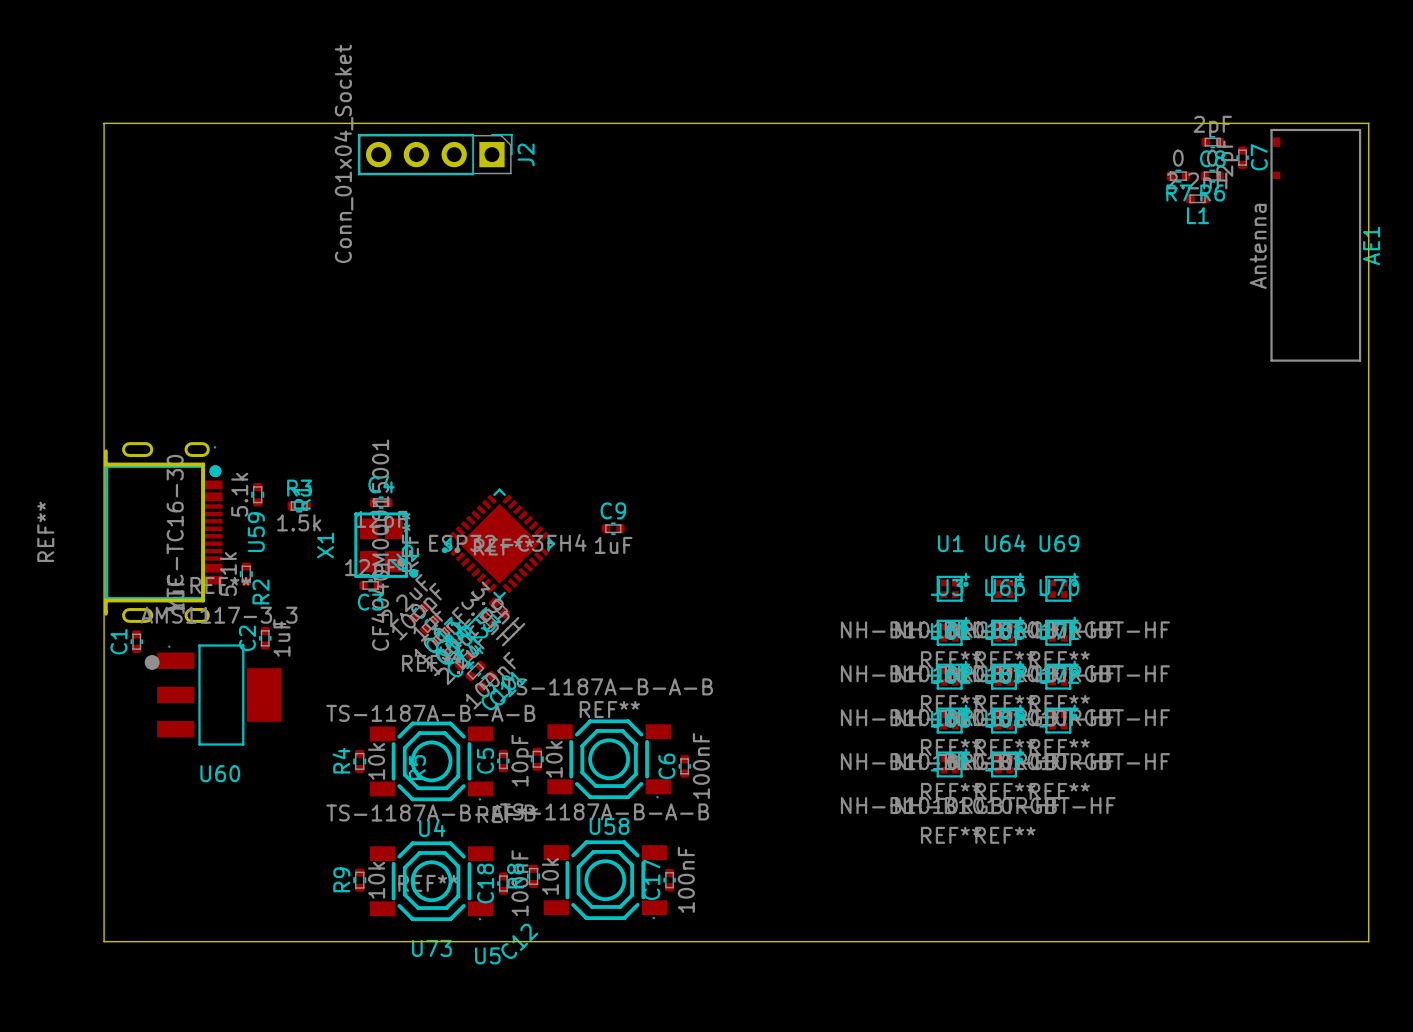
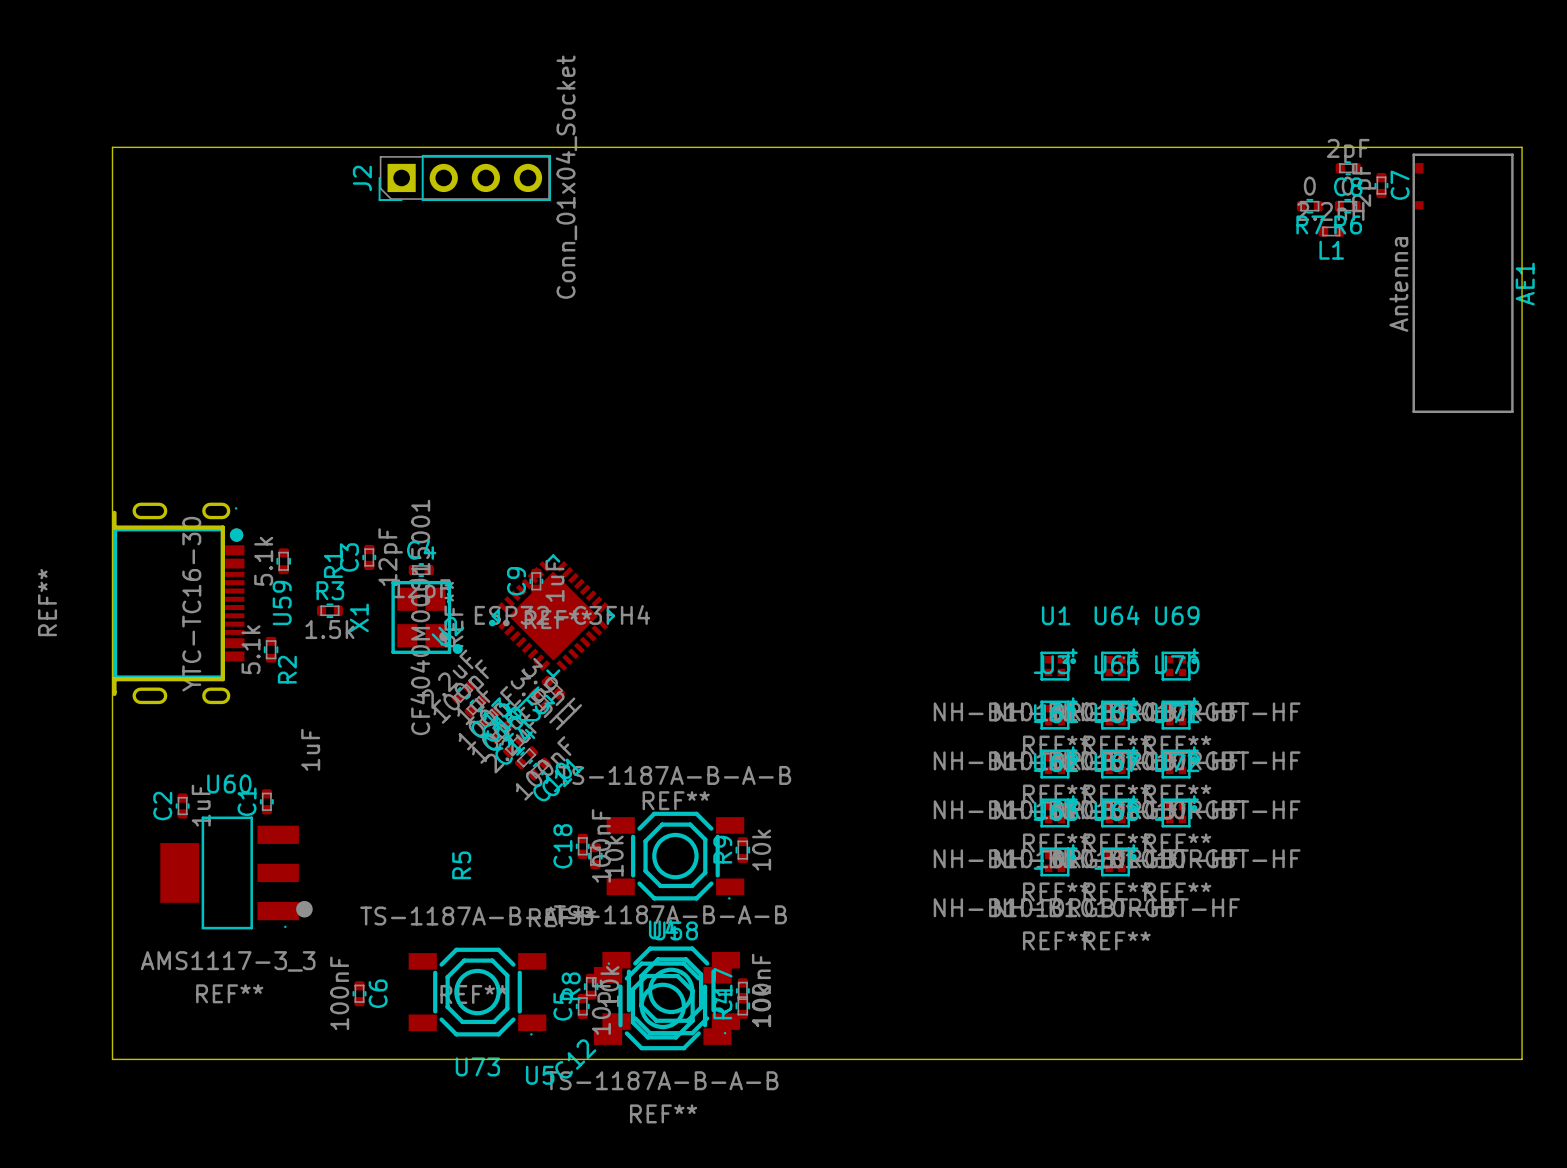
J2 rotation: 0° (435, 154) -> 180° (464, 177)
R3 position: (299, 506) -> (329, 610)
C9 rotation: 0° (613, 528) -> 90° clockwise (536, 581)
C9 position: (613, 528) -> (536, 581)
C3 rotation: 0° (370, 585) -> 90° clockwise (369, 557)
C3 position: (370, 585) -> (369, 557)
C2 position: (265, 638) -> (182, 806)
C1 position: (136, 641) -> (266, 801)
U60 rotation: 0° (213, 695) -> 180° (236, 872)
C5 position: (503, 760) -> (582, 1006)
R4 position: (359, 761) -> (742, 1005)
U4 rotation: 0° (431, 761) -> 180° (662, 1005)
U4 position: (431, 761) -> (662, 1005)
C6 name position: C6 (666, 766) -> C6 (378, 993)
C6 position: (684, 766) -> (359, 993)
C6 value position: 100nF (701, 766) -> 100nF (339, 993)
R9 position: (359, 880) -> (742, 850)
C18 position: (503, 883) -> (582, 846)

